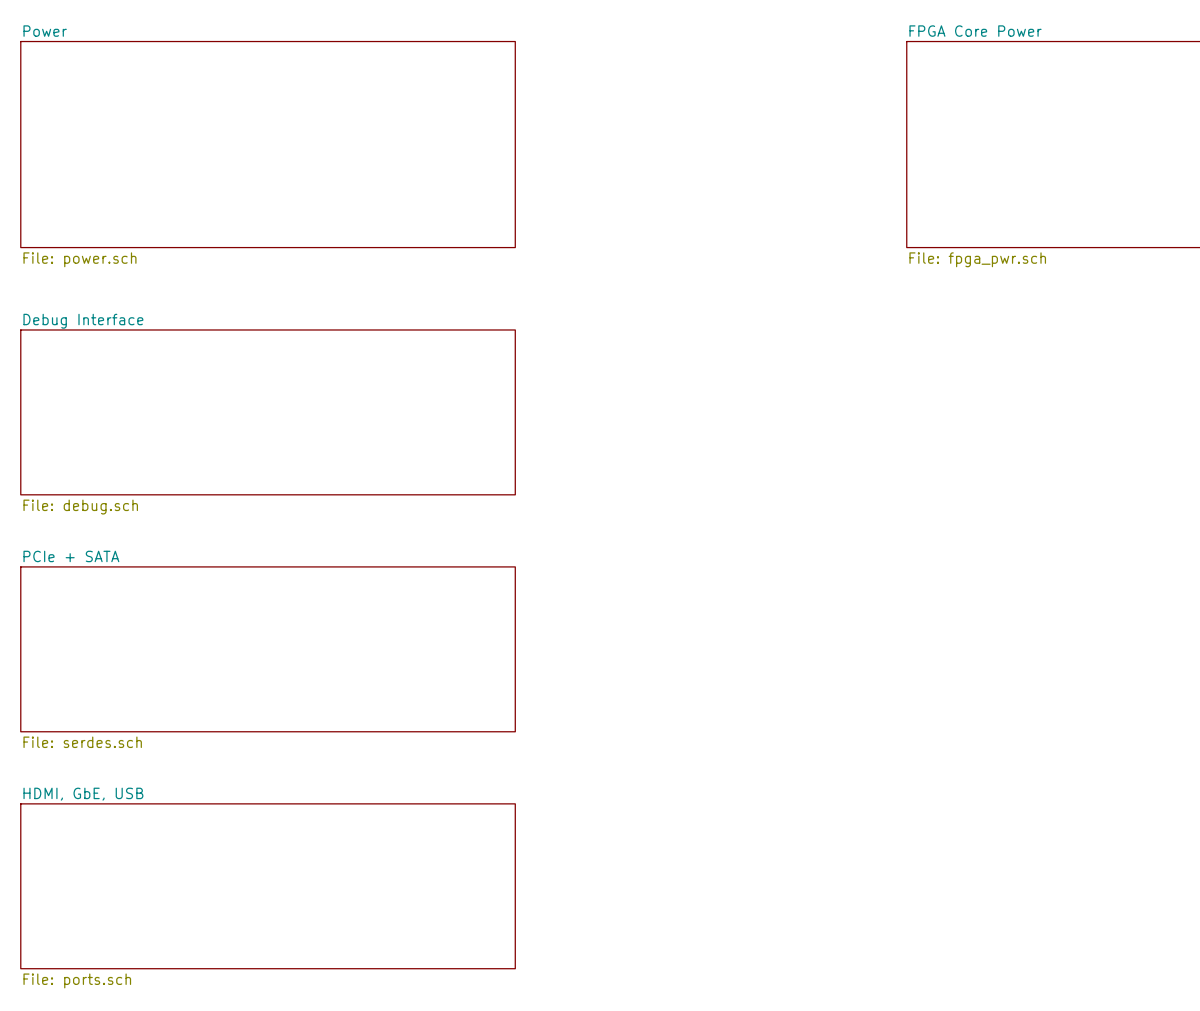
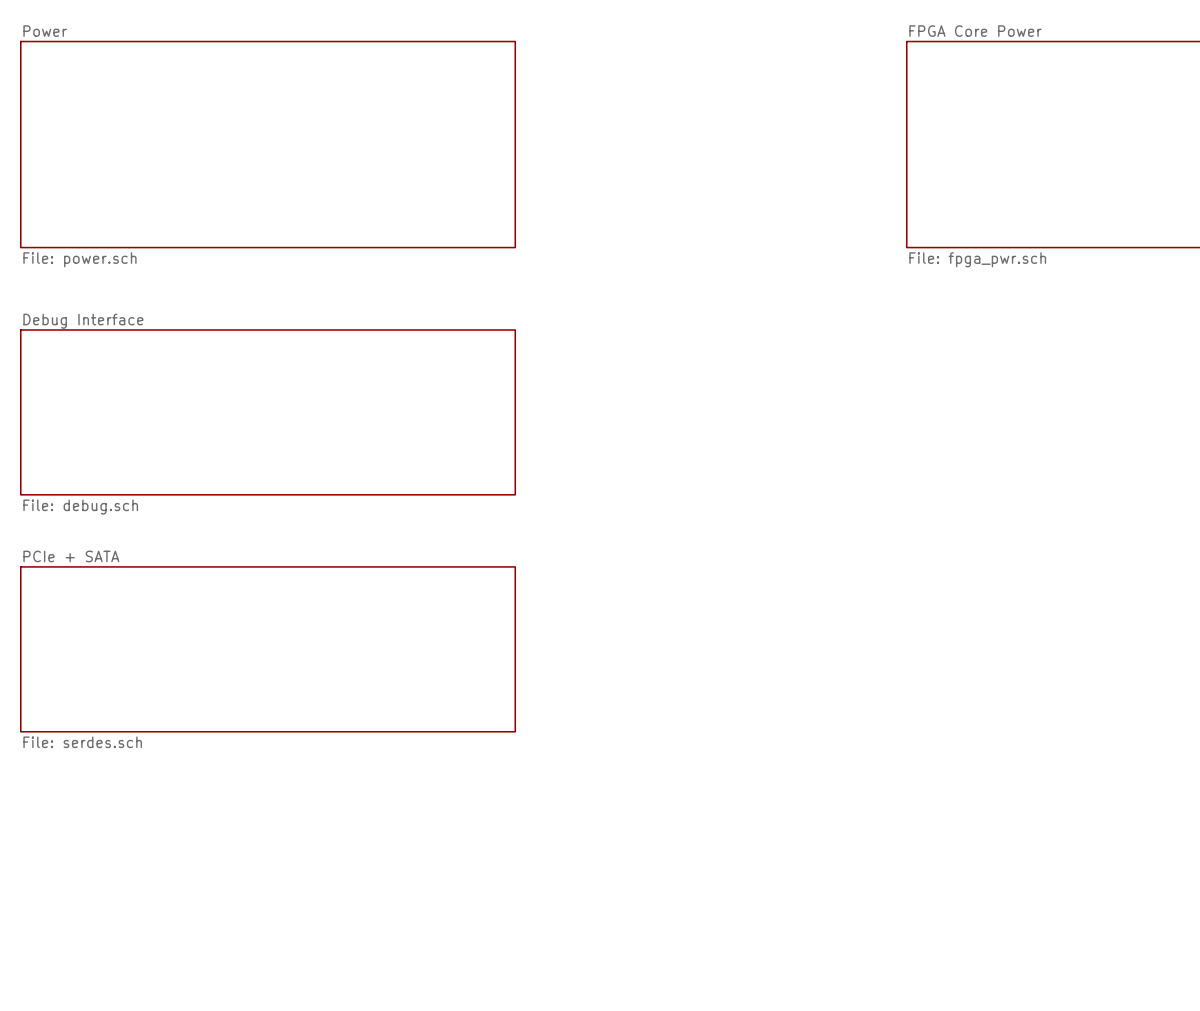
sheet HDMI, GbE, USB: File: ports.sch (268, 886) -> none

